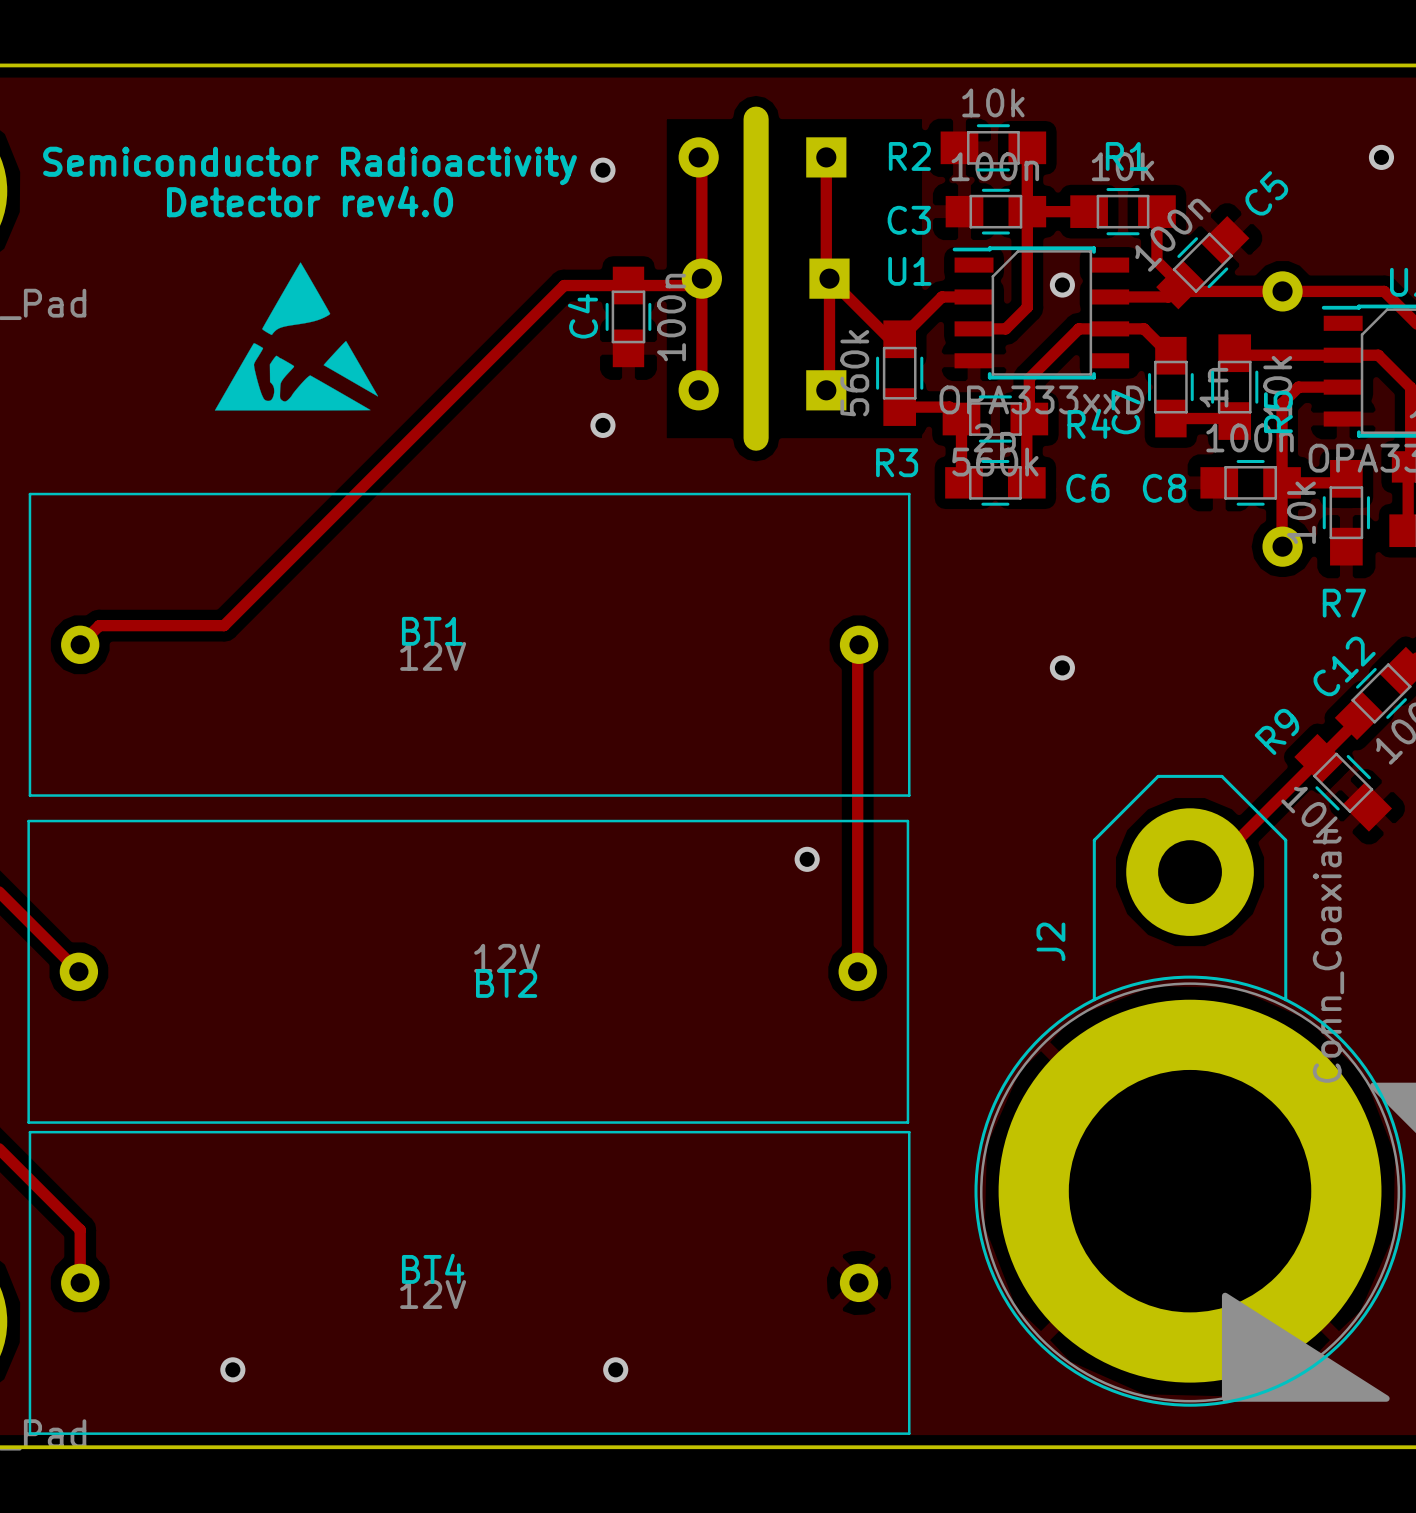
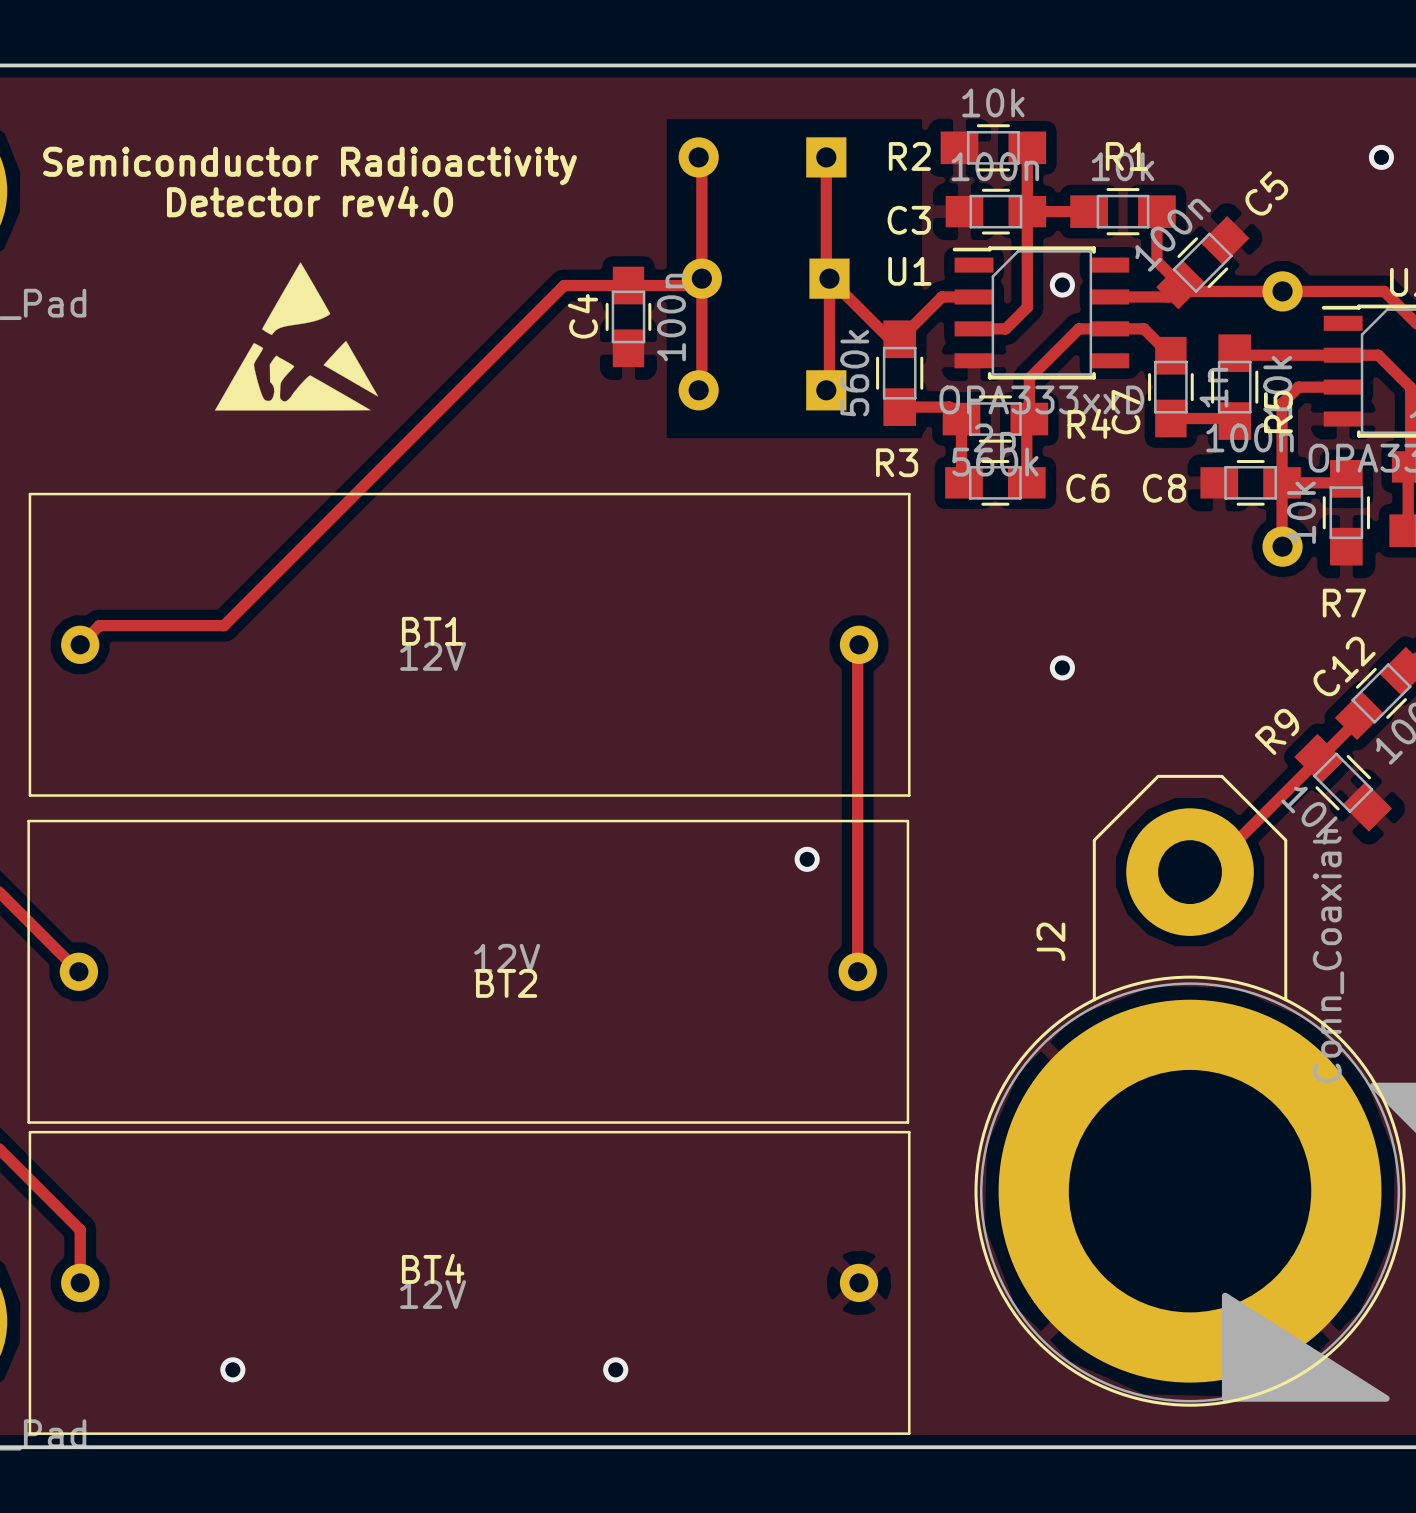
board edge: (756, 119) (756, 438) -> none
via: (602, 170) -> none
via: (602, 425) -> none

